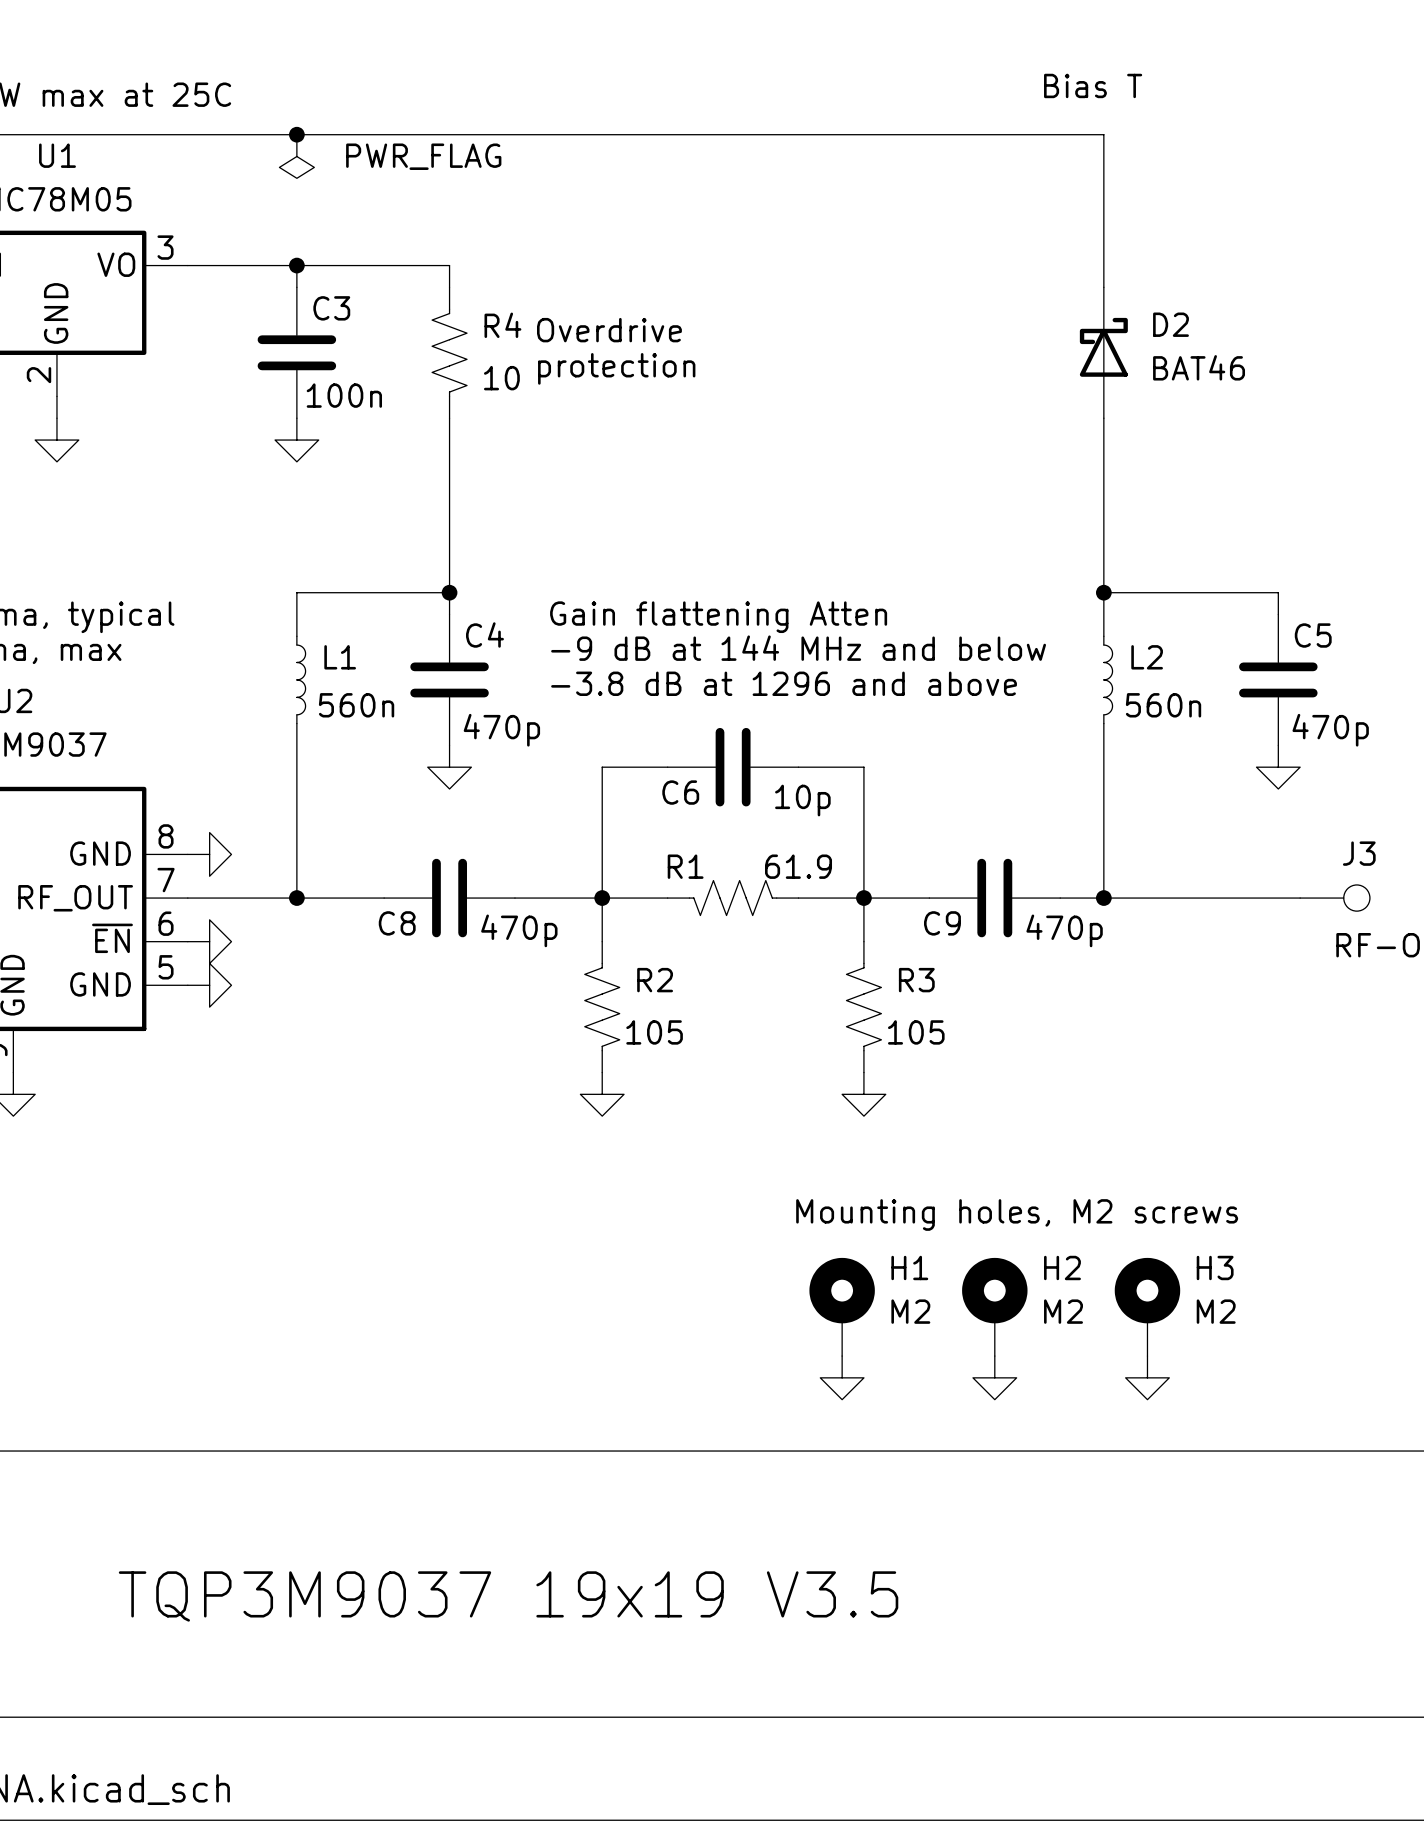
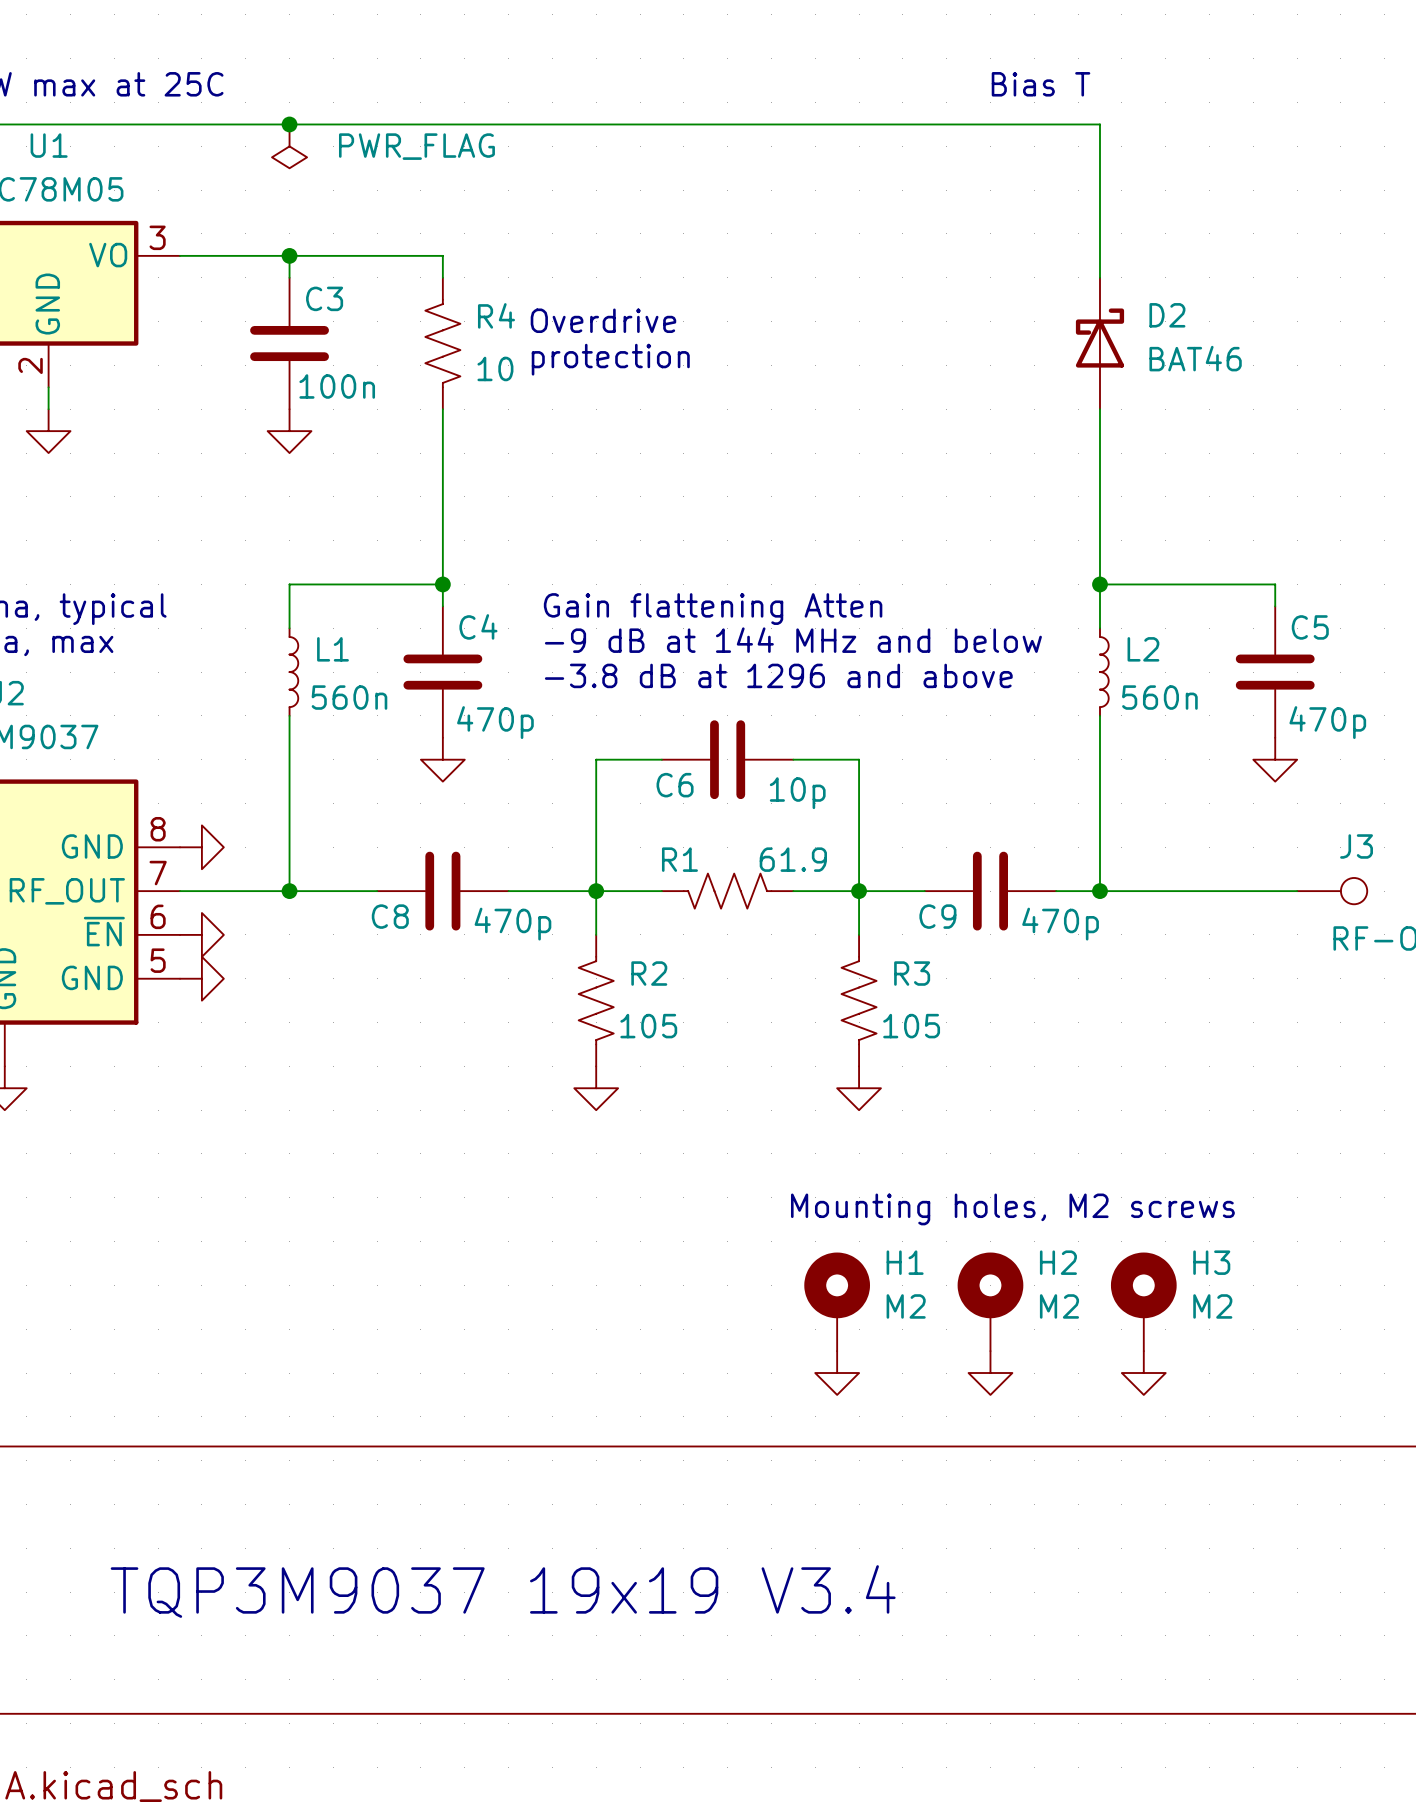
text position: Bias T (1093, 85) -> Bias T (1041, 84)
text: TQP3M9037 19x19 V3.5 (508, 1596) -> TQP3M9037 19x19 V3.4 (503, 1591)

